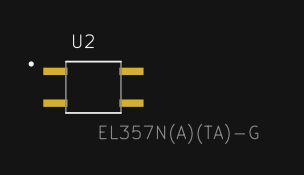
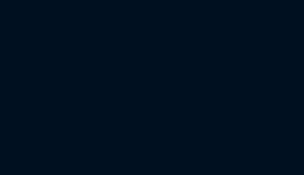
U2: EL357N(A)(TA)-G (86, 87) -> none

